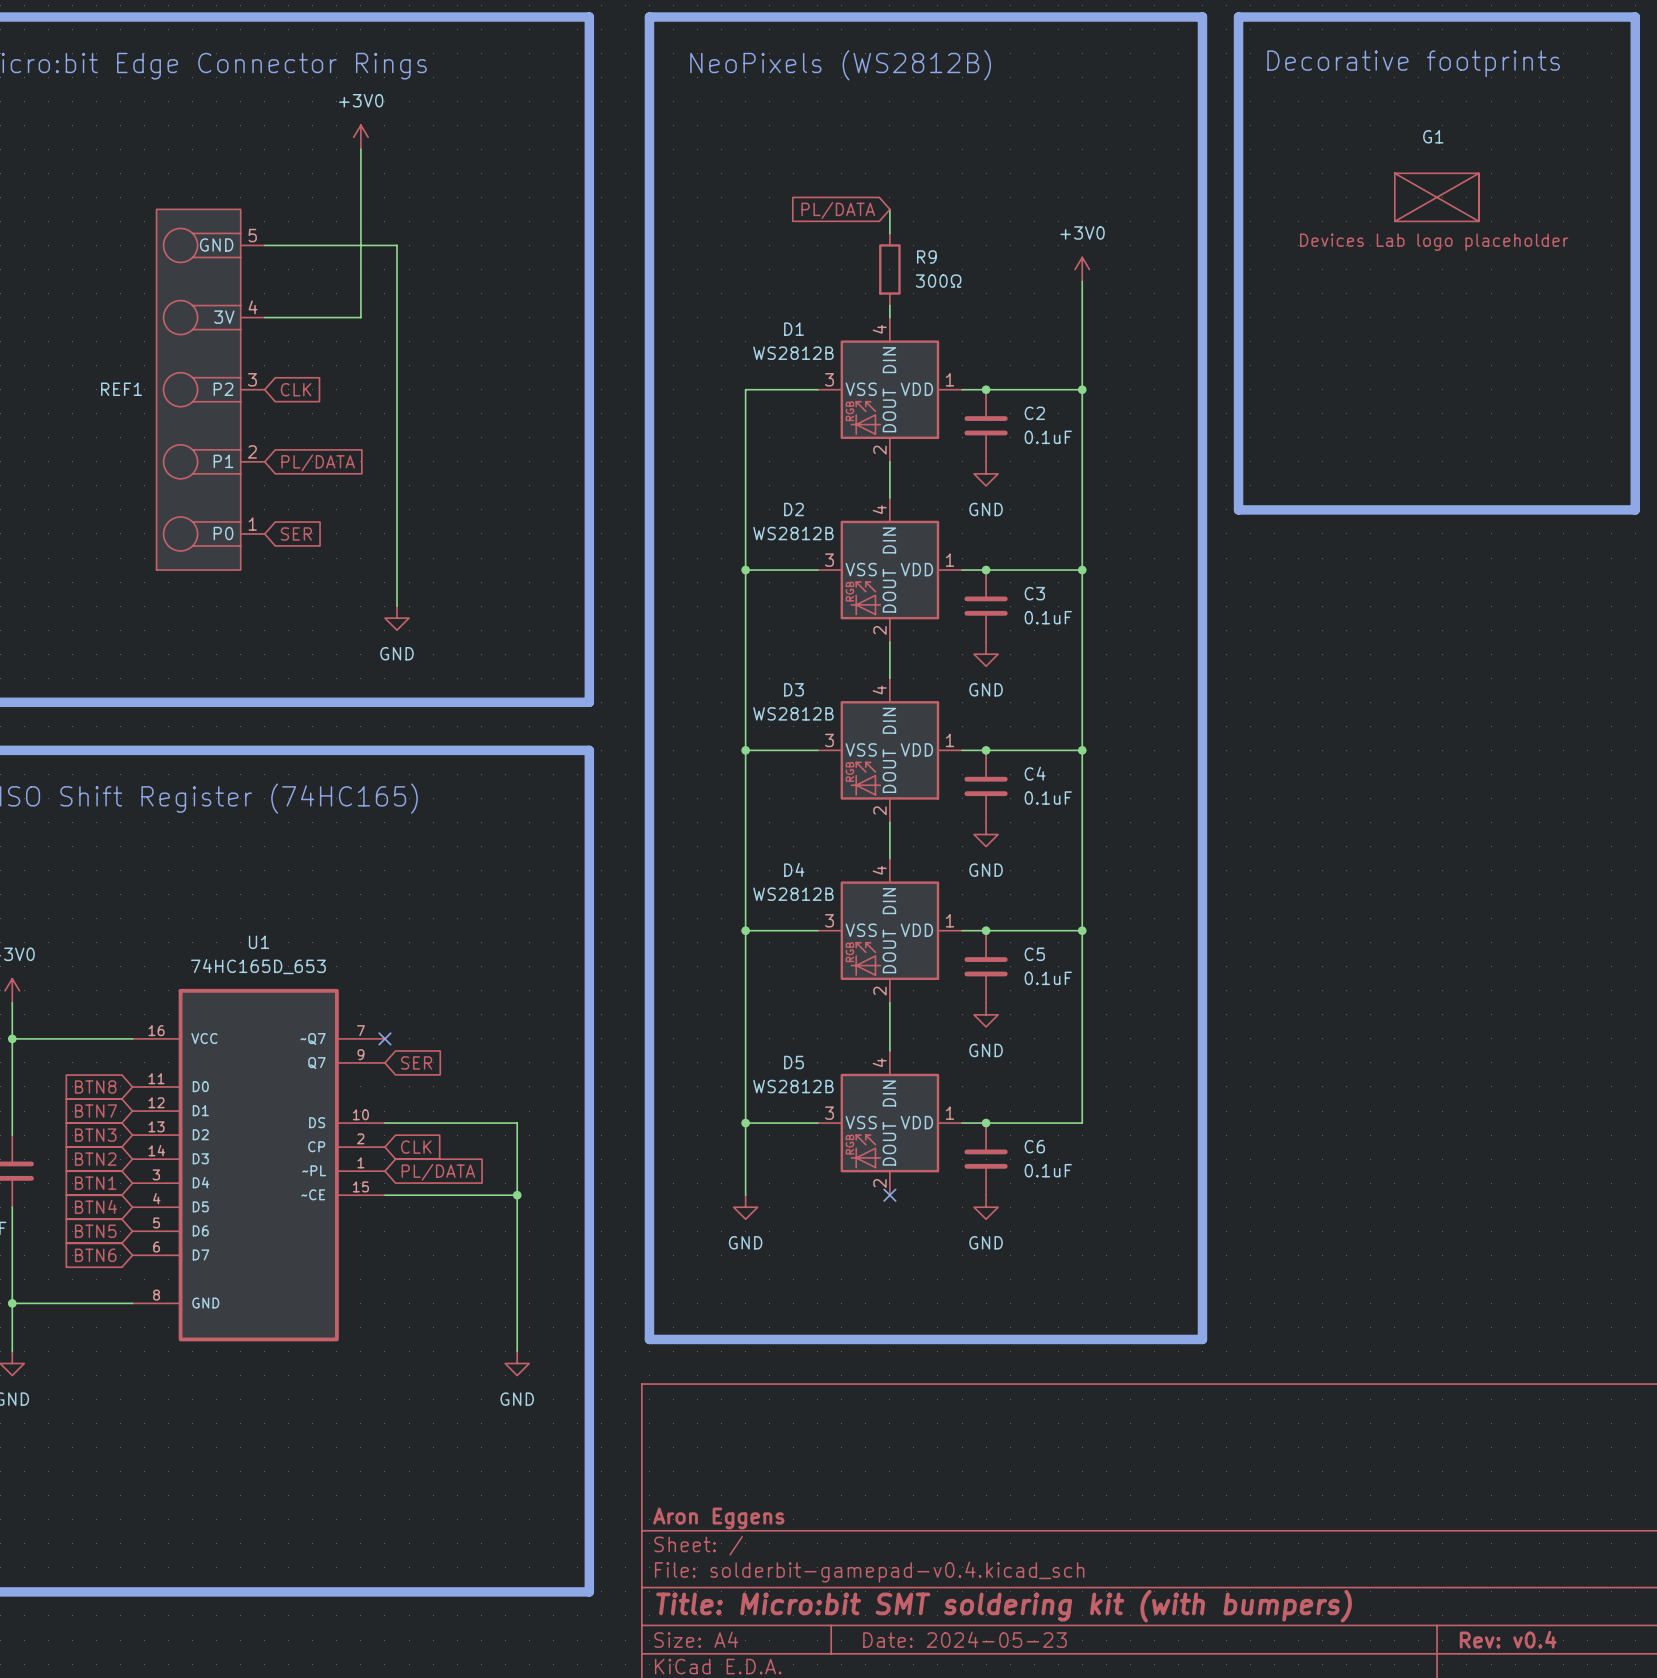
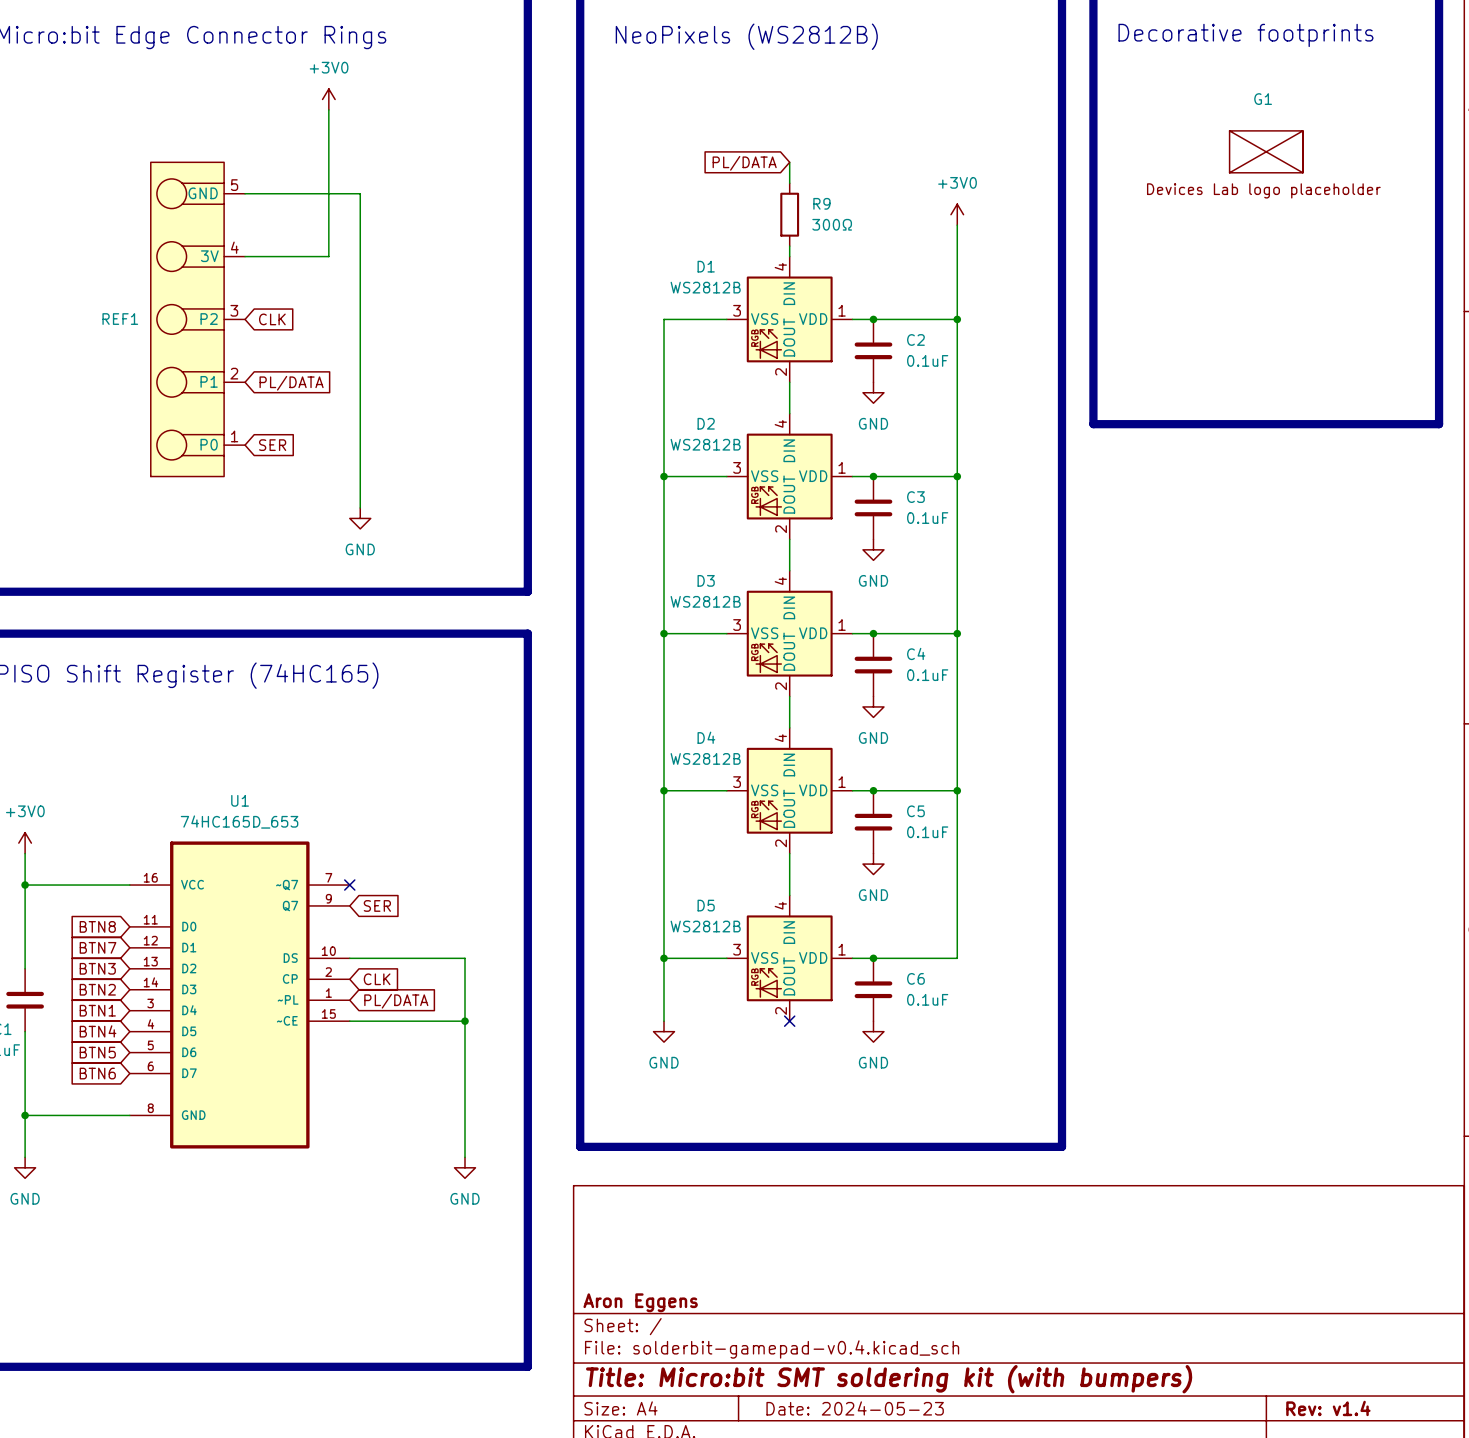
title block: Rev: v0.4 (1508, 1639) -> Rev: v1.4 (1328, 1408)

